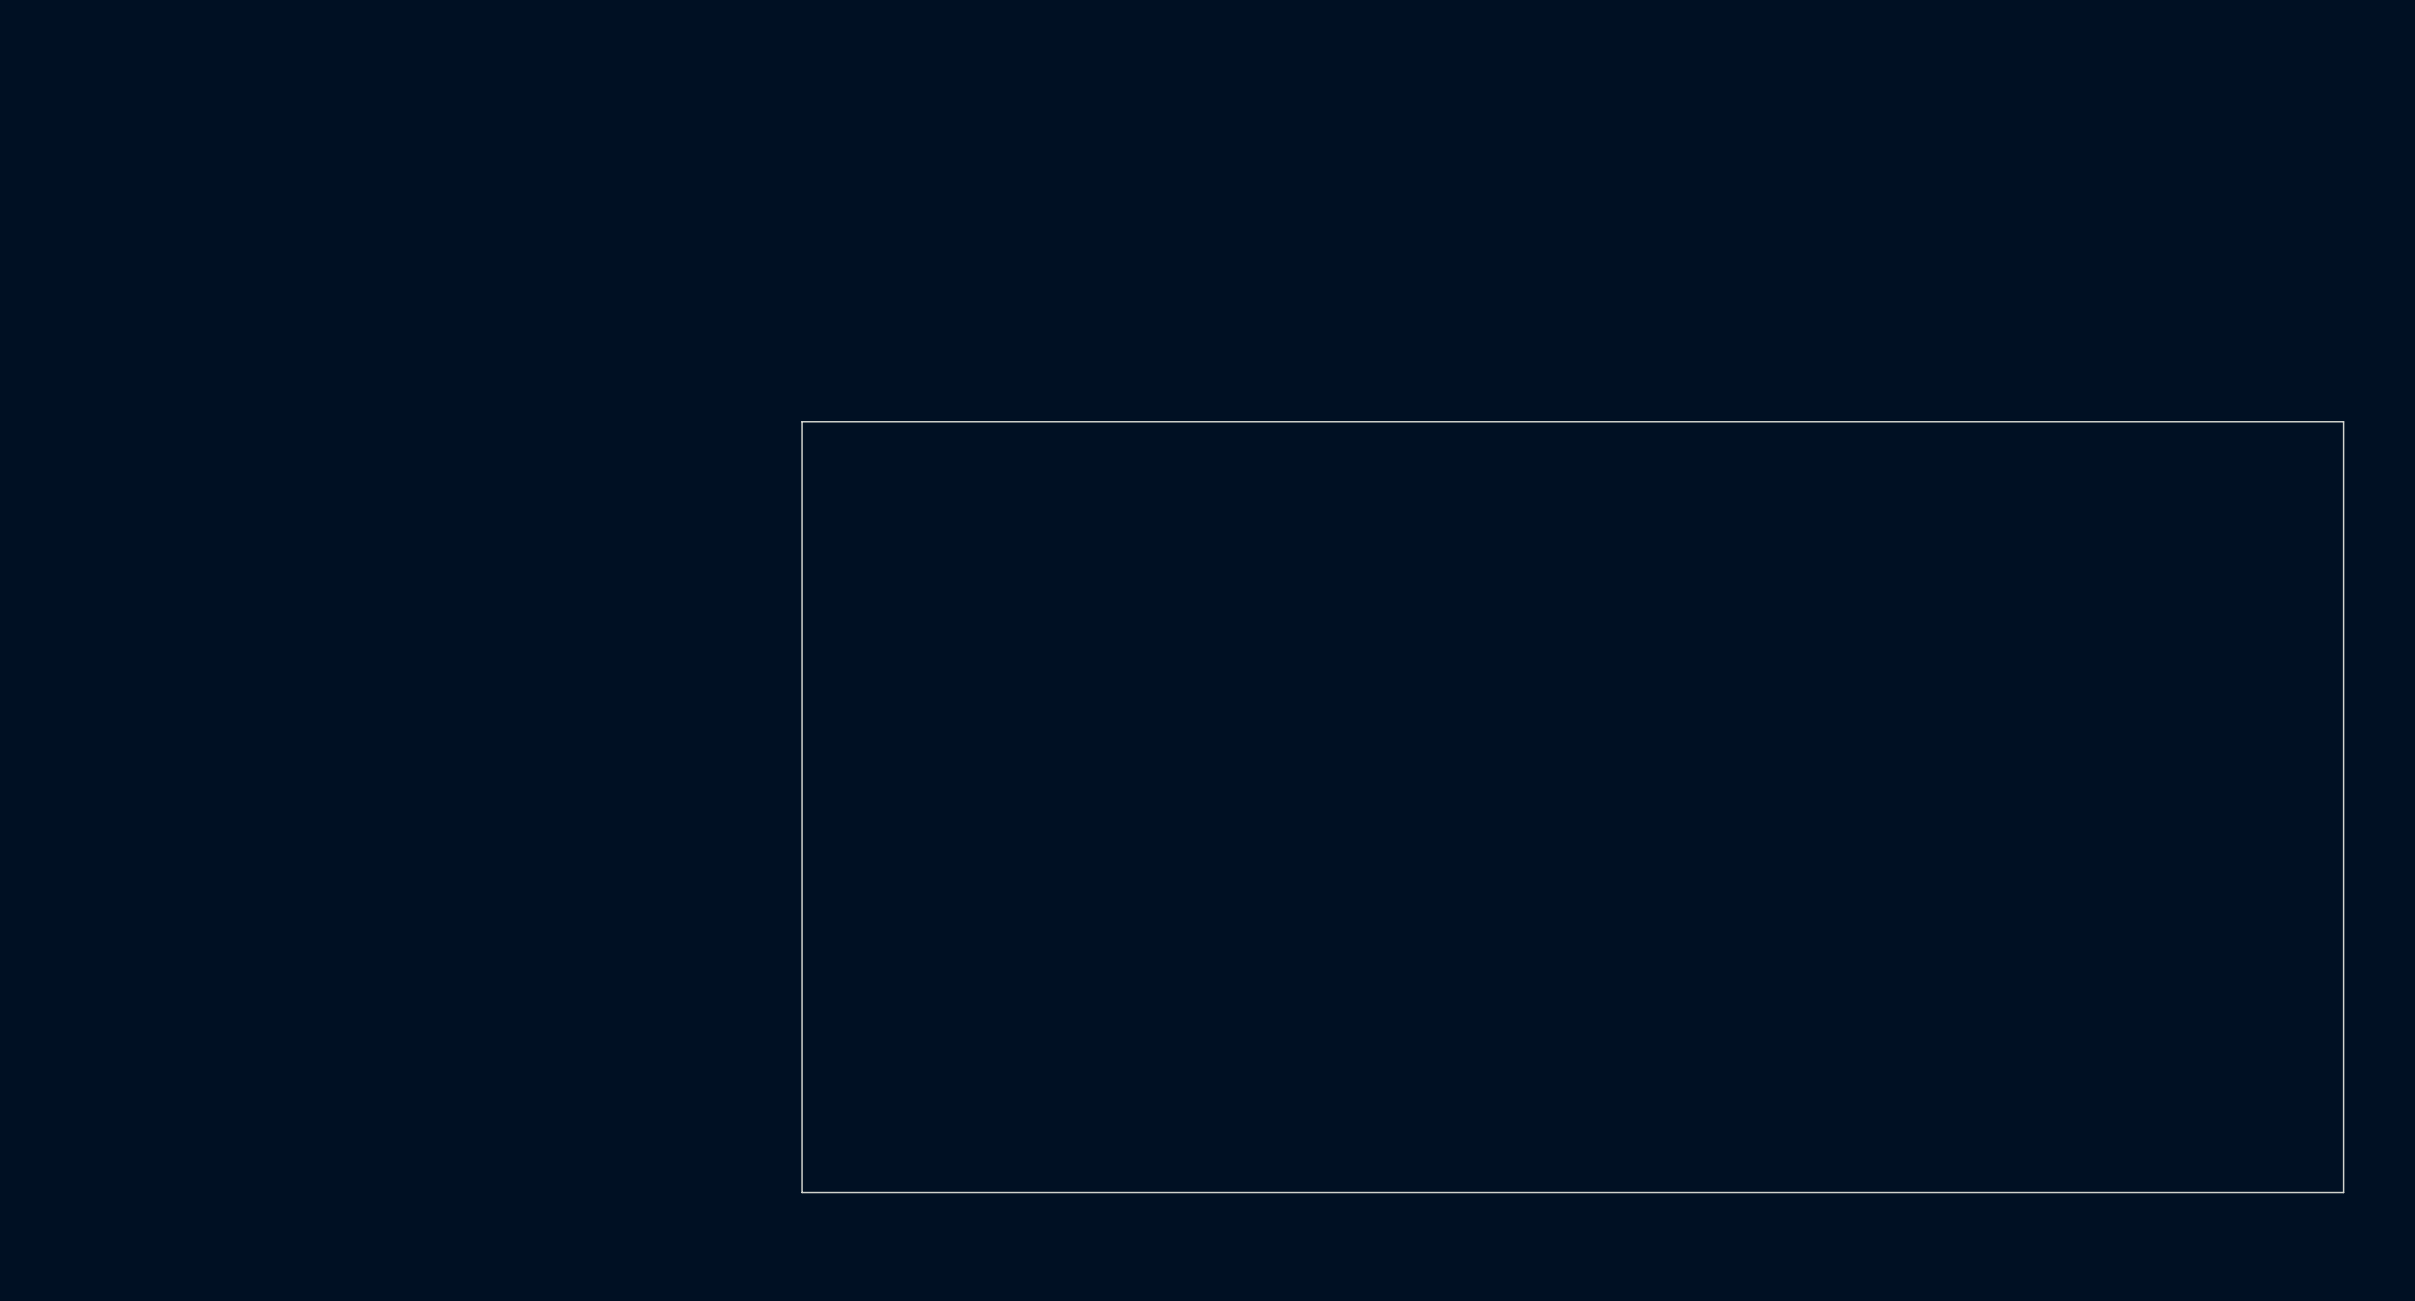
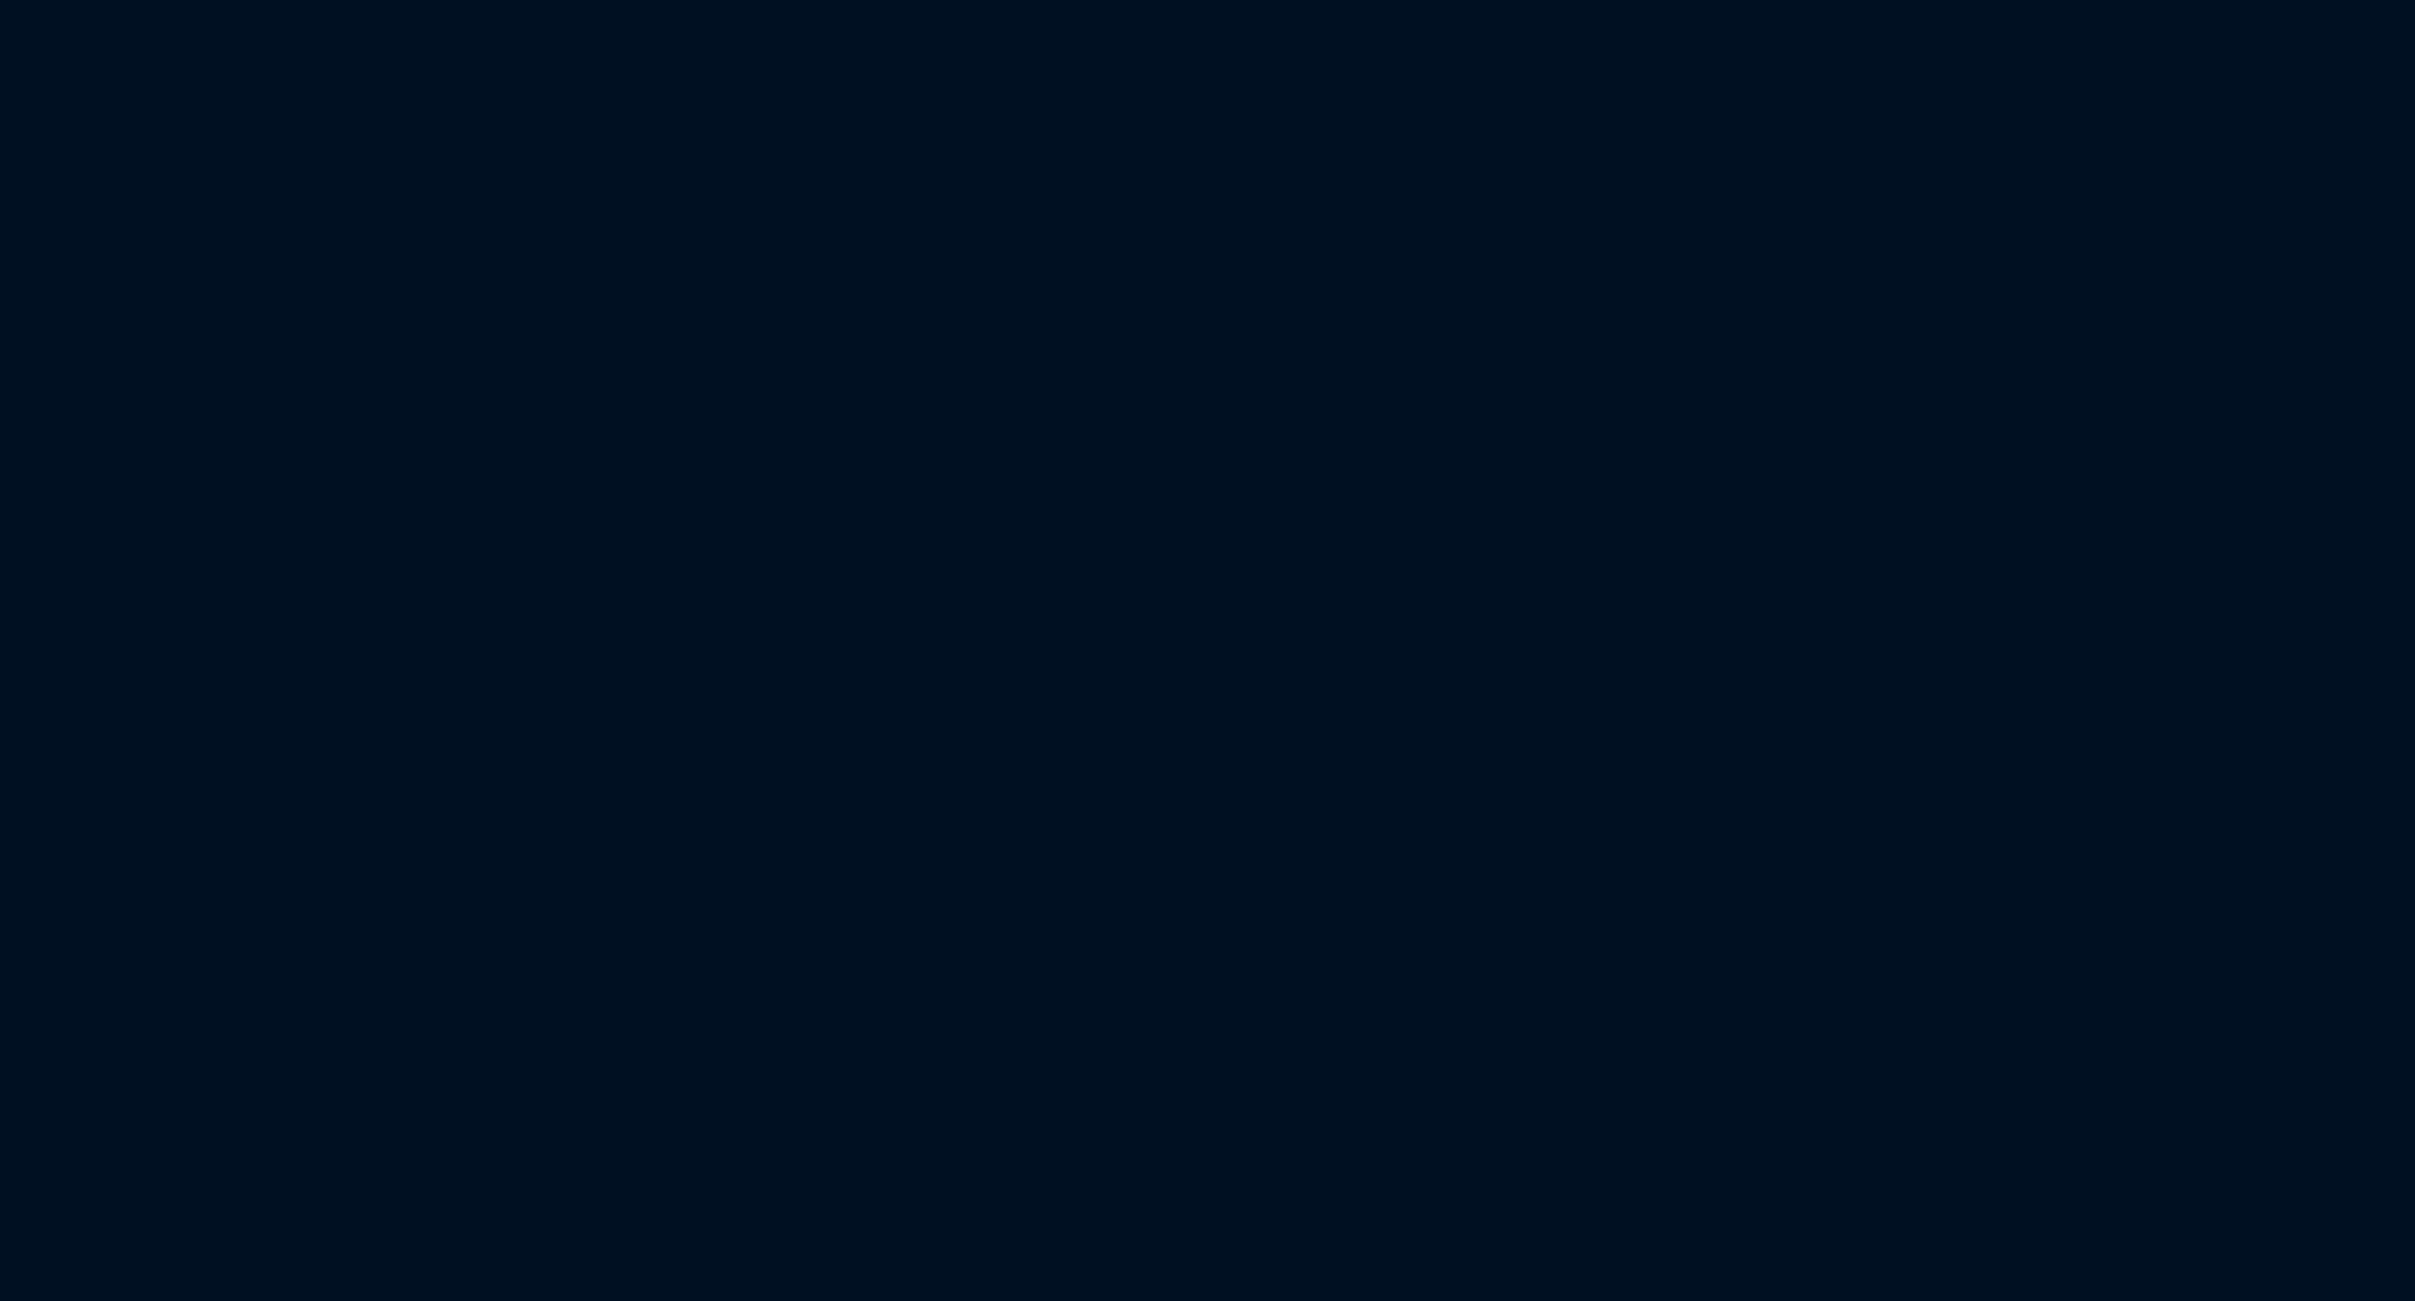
board edge: (802, 421) (2343, 421) (2343, 1192) (802, 1192) (802, 421) -> none

